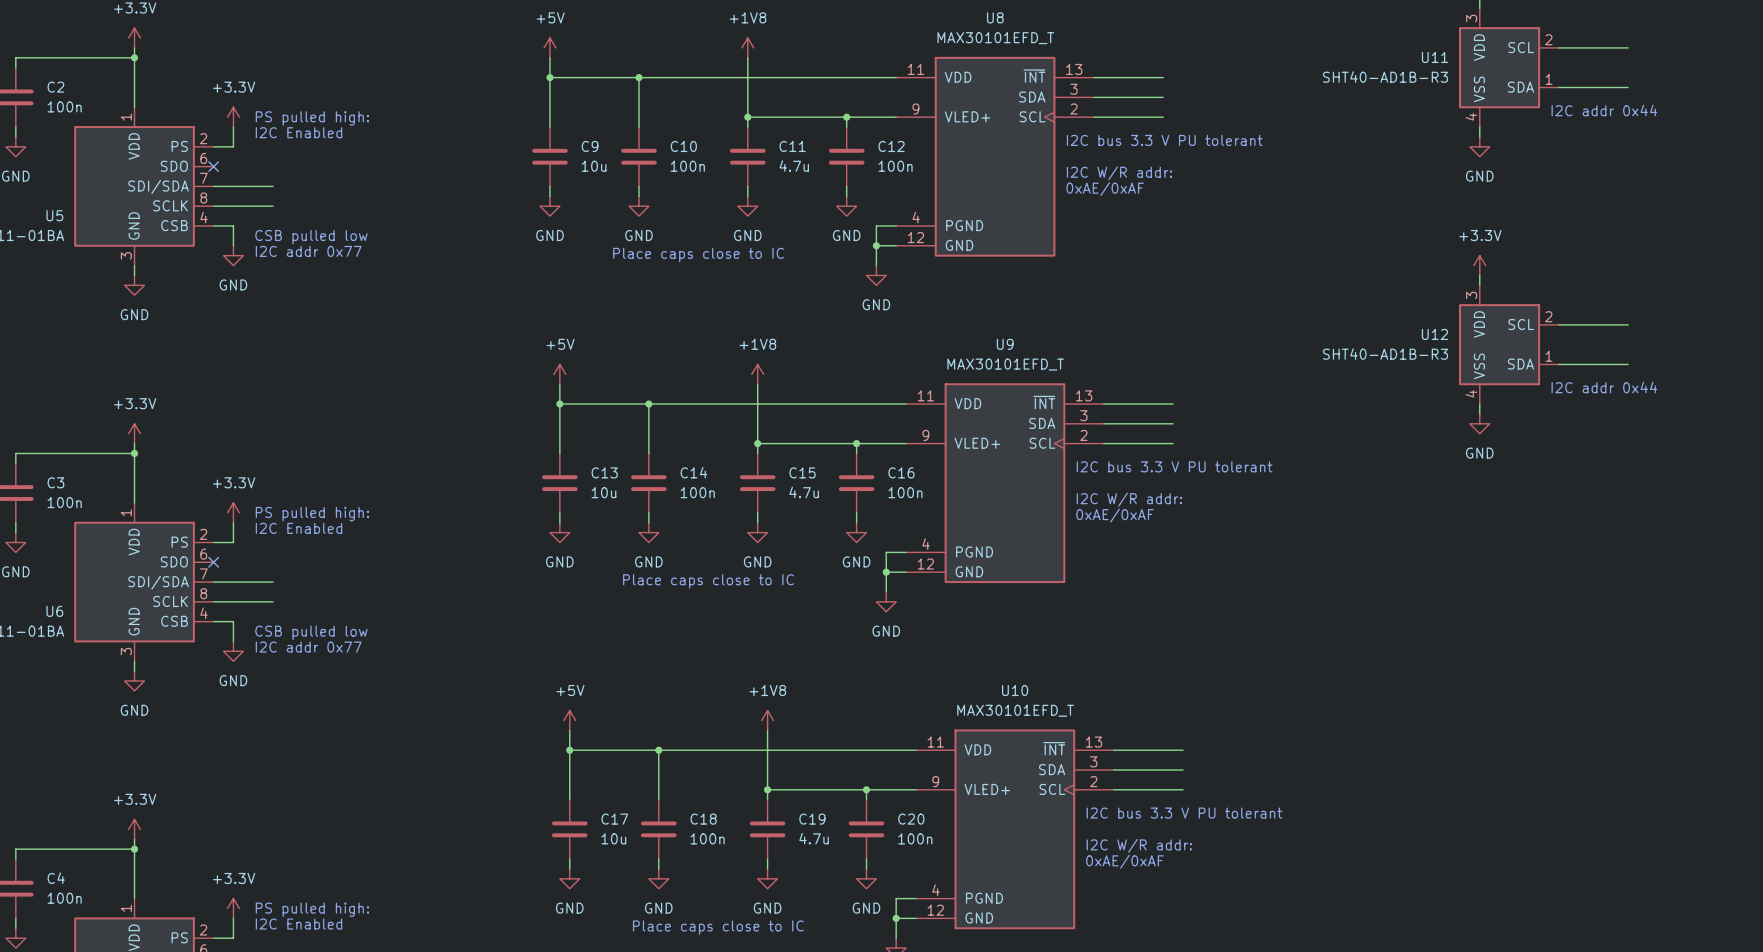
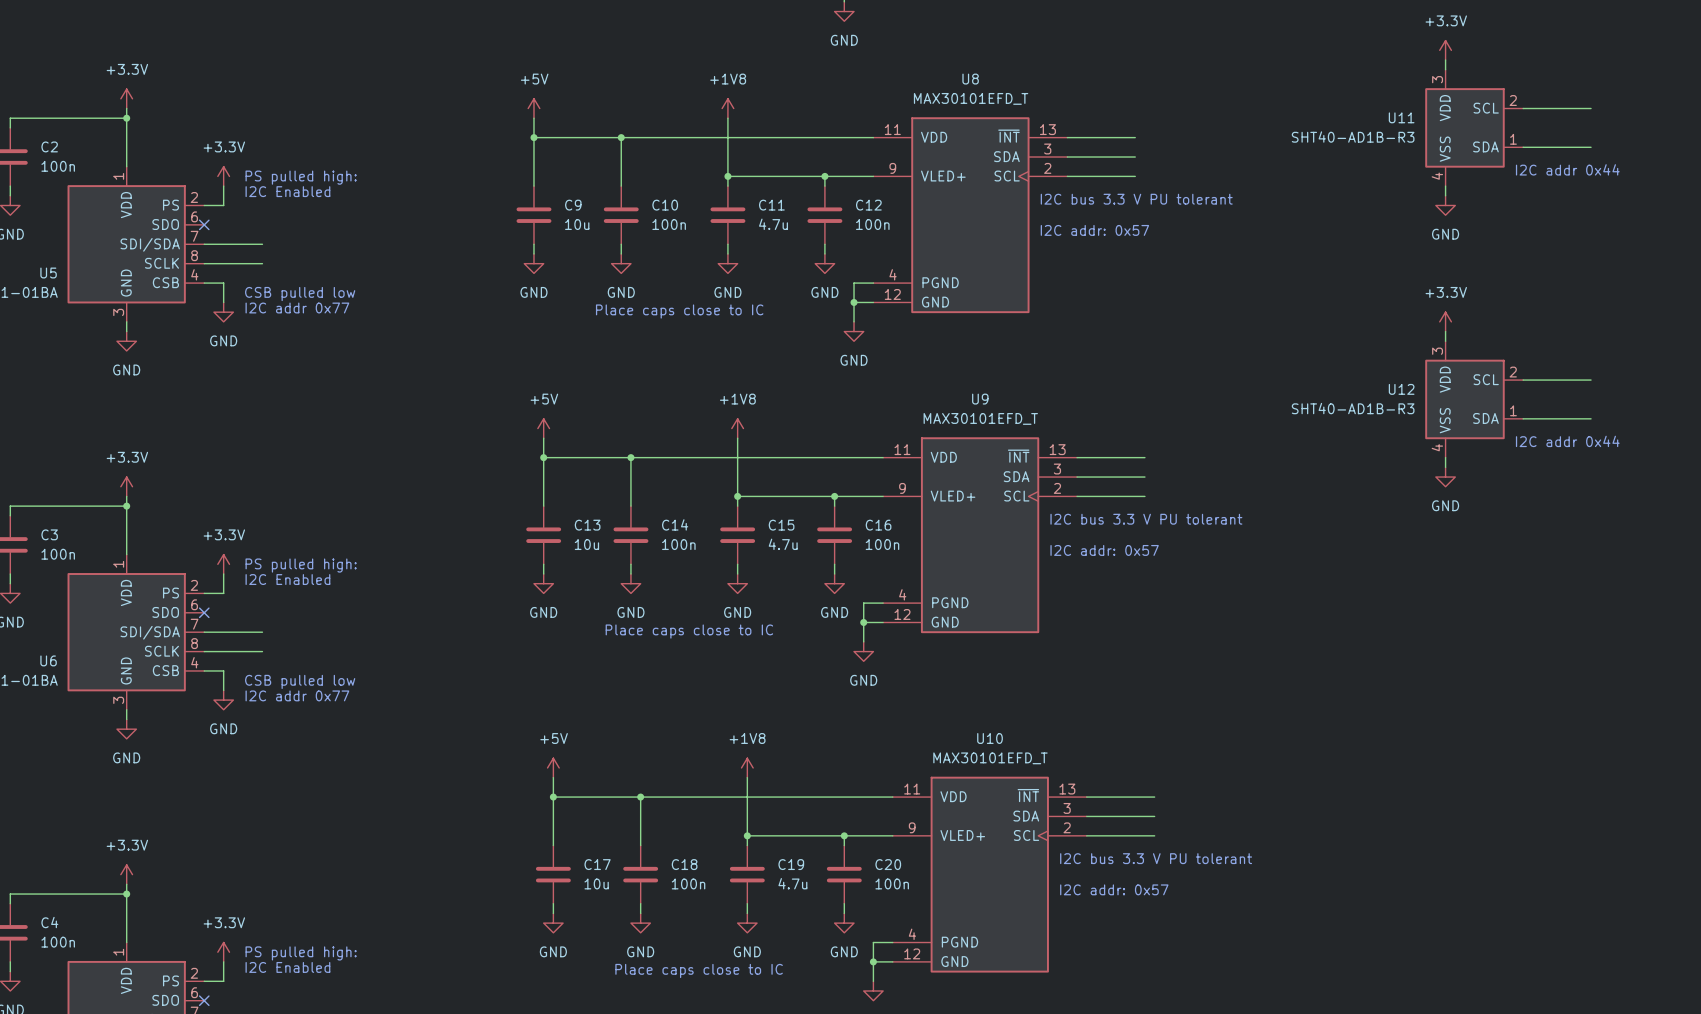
text: I2C W/R addr: (1119, 173) -> I2C addr: 0x57 (1094, 230)
text: 0xAE/0xAF (1105, 189) -> none
text: I2C W/R addr: (1129, 499) -> I2C addr: 0x57 (1104, 550)
text: 0xAE/0xAF (1115, 515) -> none
text: I2C W/R addr: (1139, 845) -> I2C addr: 0x57 (1114, 889)
text: 0xAE/0xAF (1124, 861) -> none

